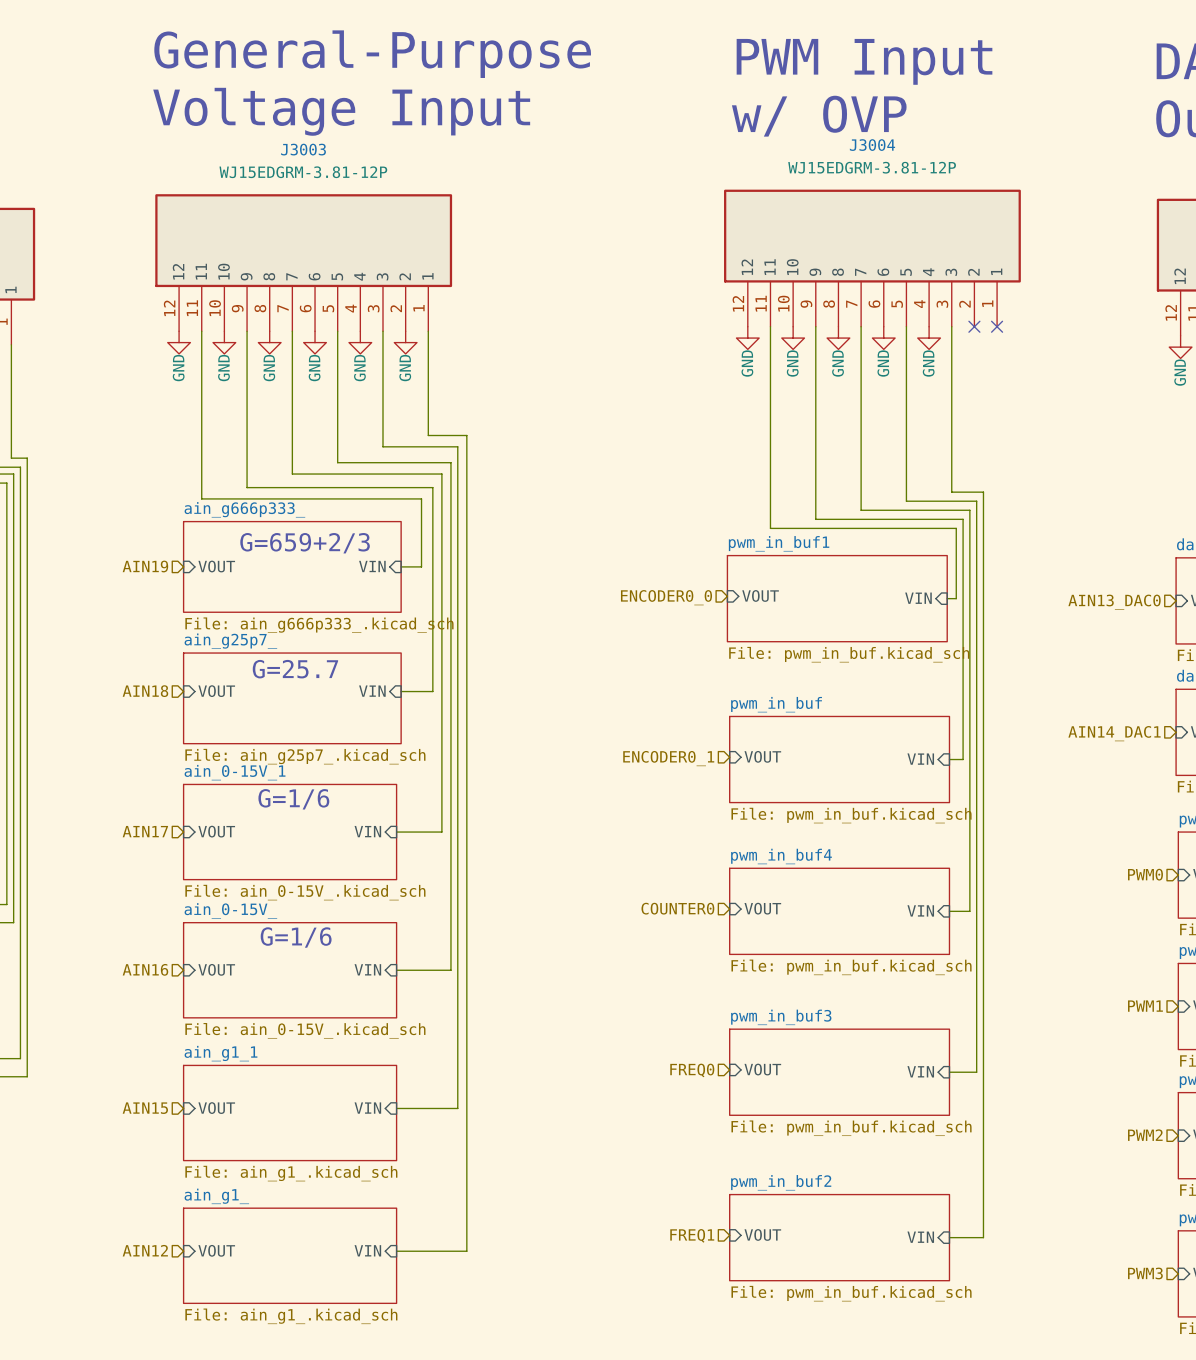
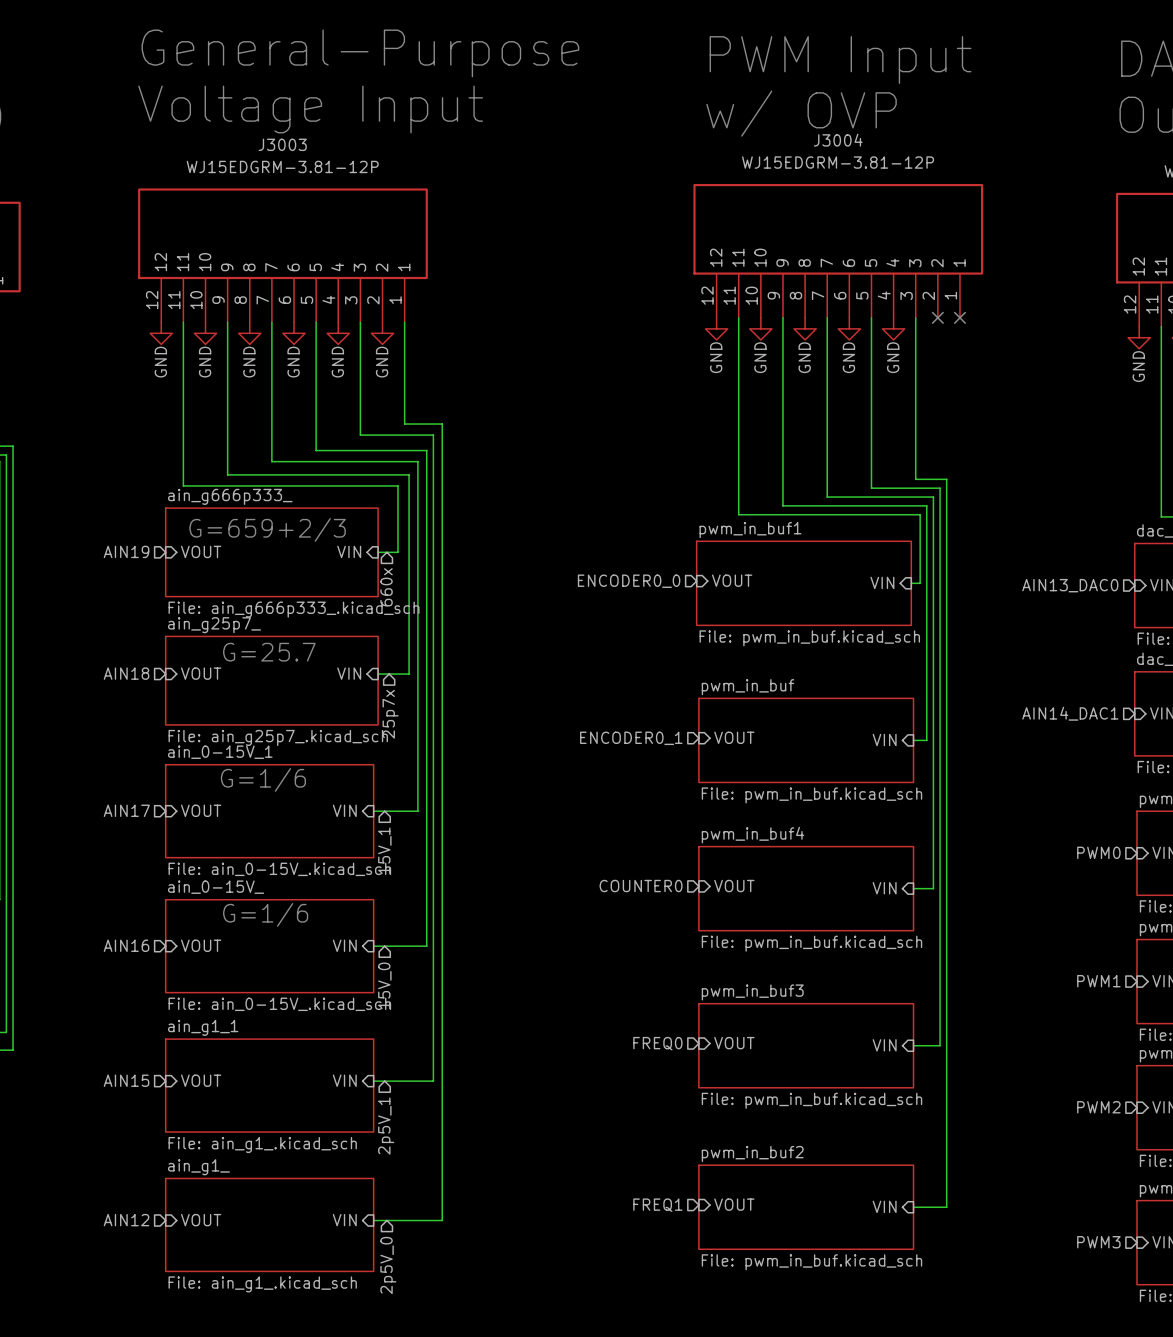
hierarchical label: none -> 660x (386, 587)
hierarchical label: none -> 25p7x (390, 714)
hierarchical label: none -> 15V_1 (384, 850)
hierarchical label: none -> 15V_0 (384, 985)
hierarchical label: none -> 2p5V_1 (386, 1126)
hierarchical label: none -> 2p5V_0 (388, 1265)

